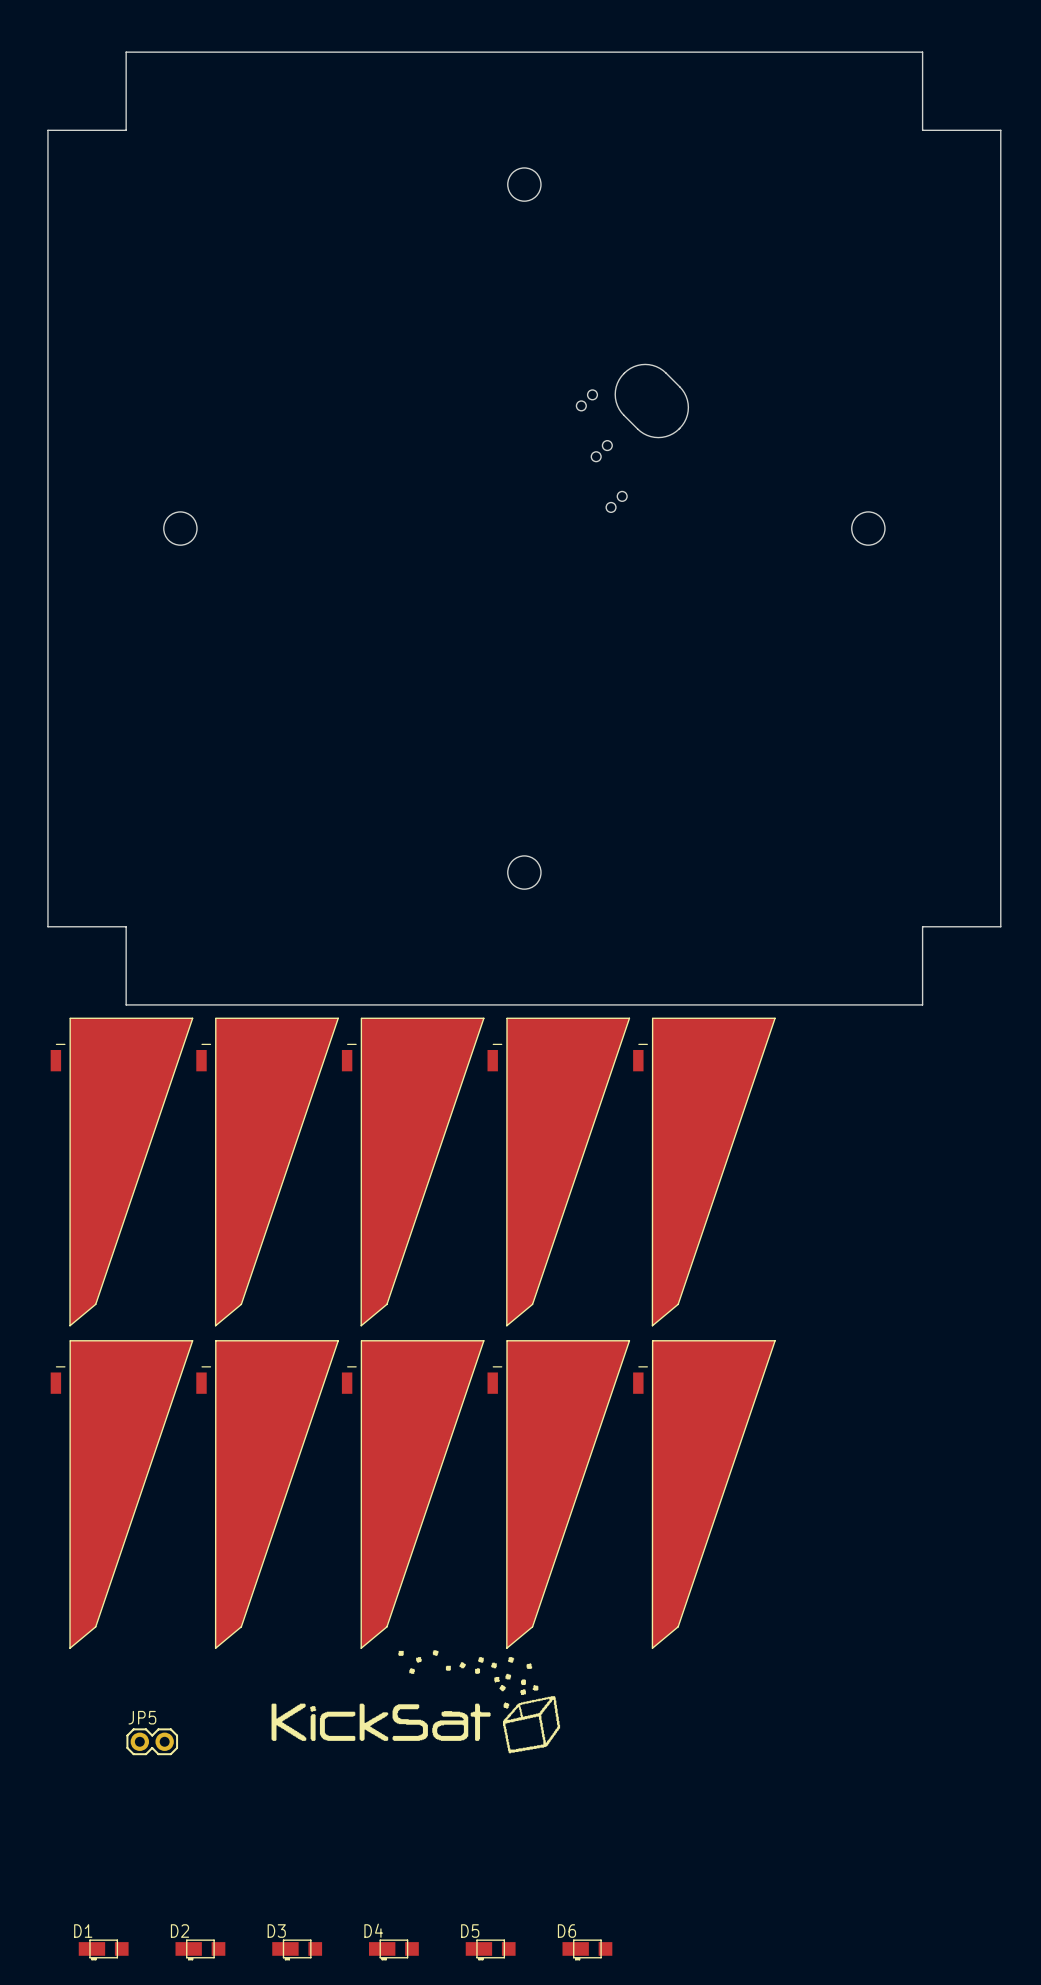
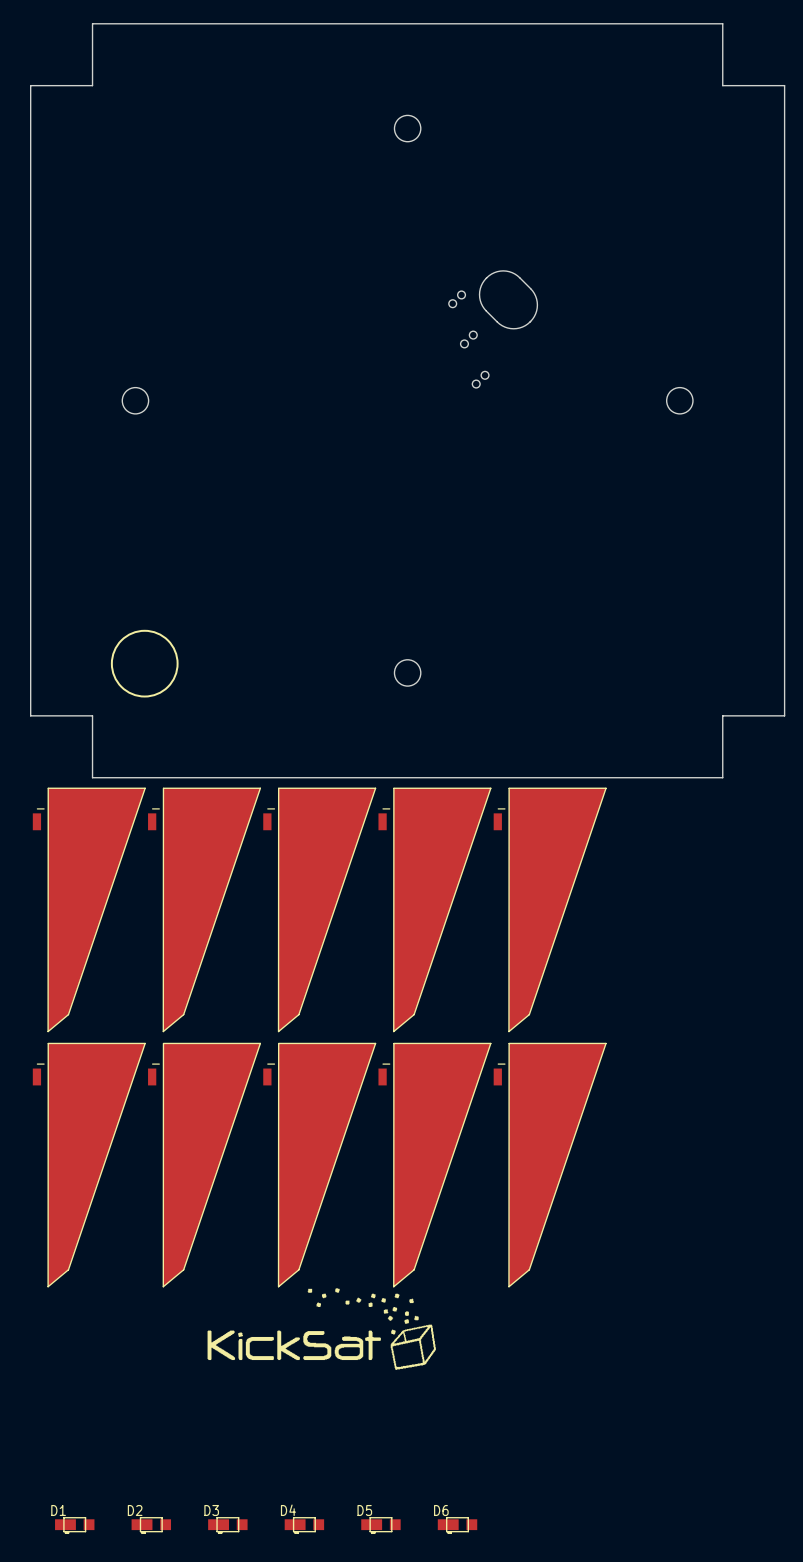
drawing: none -> [110, 629, 179, 698]
JP5: (152, 1741) -> none

